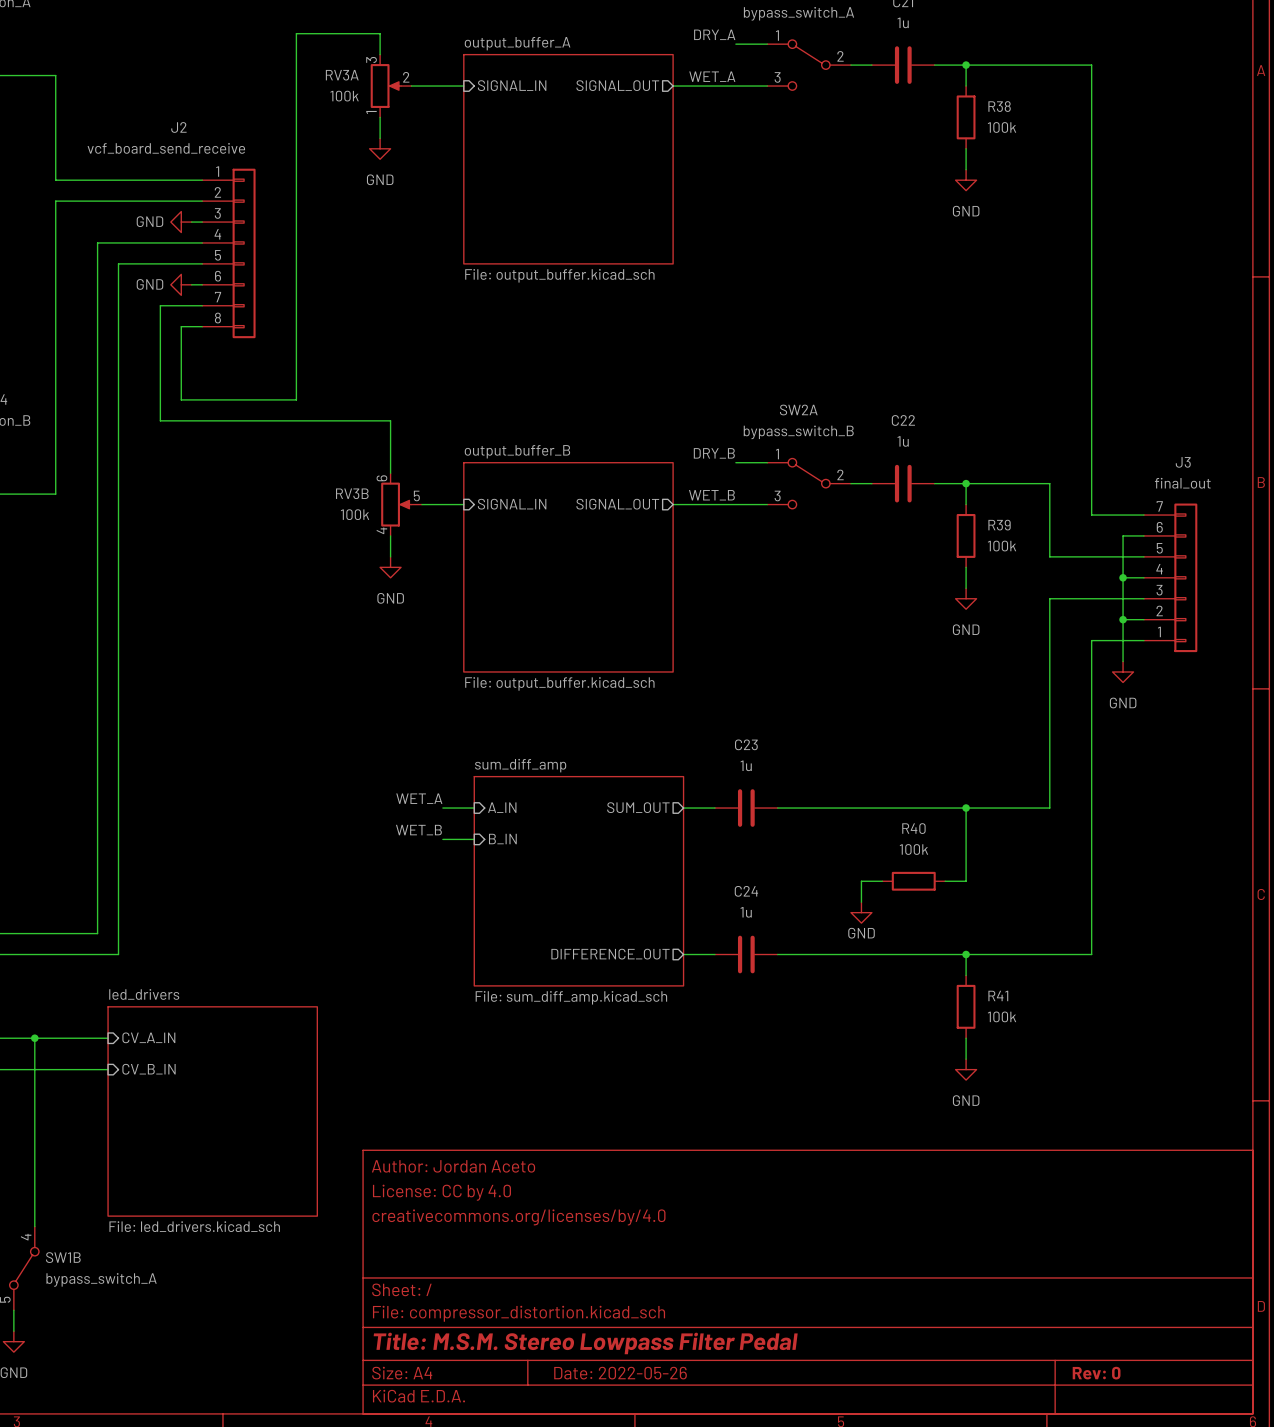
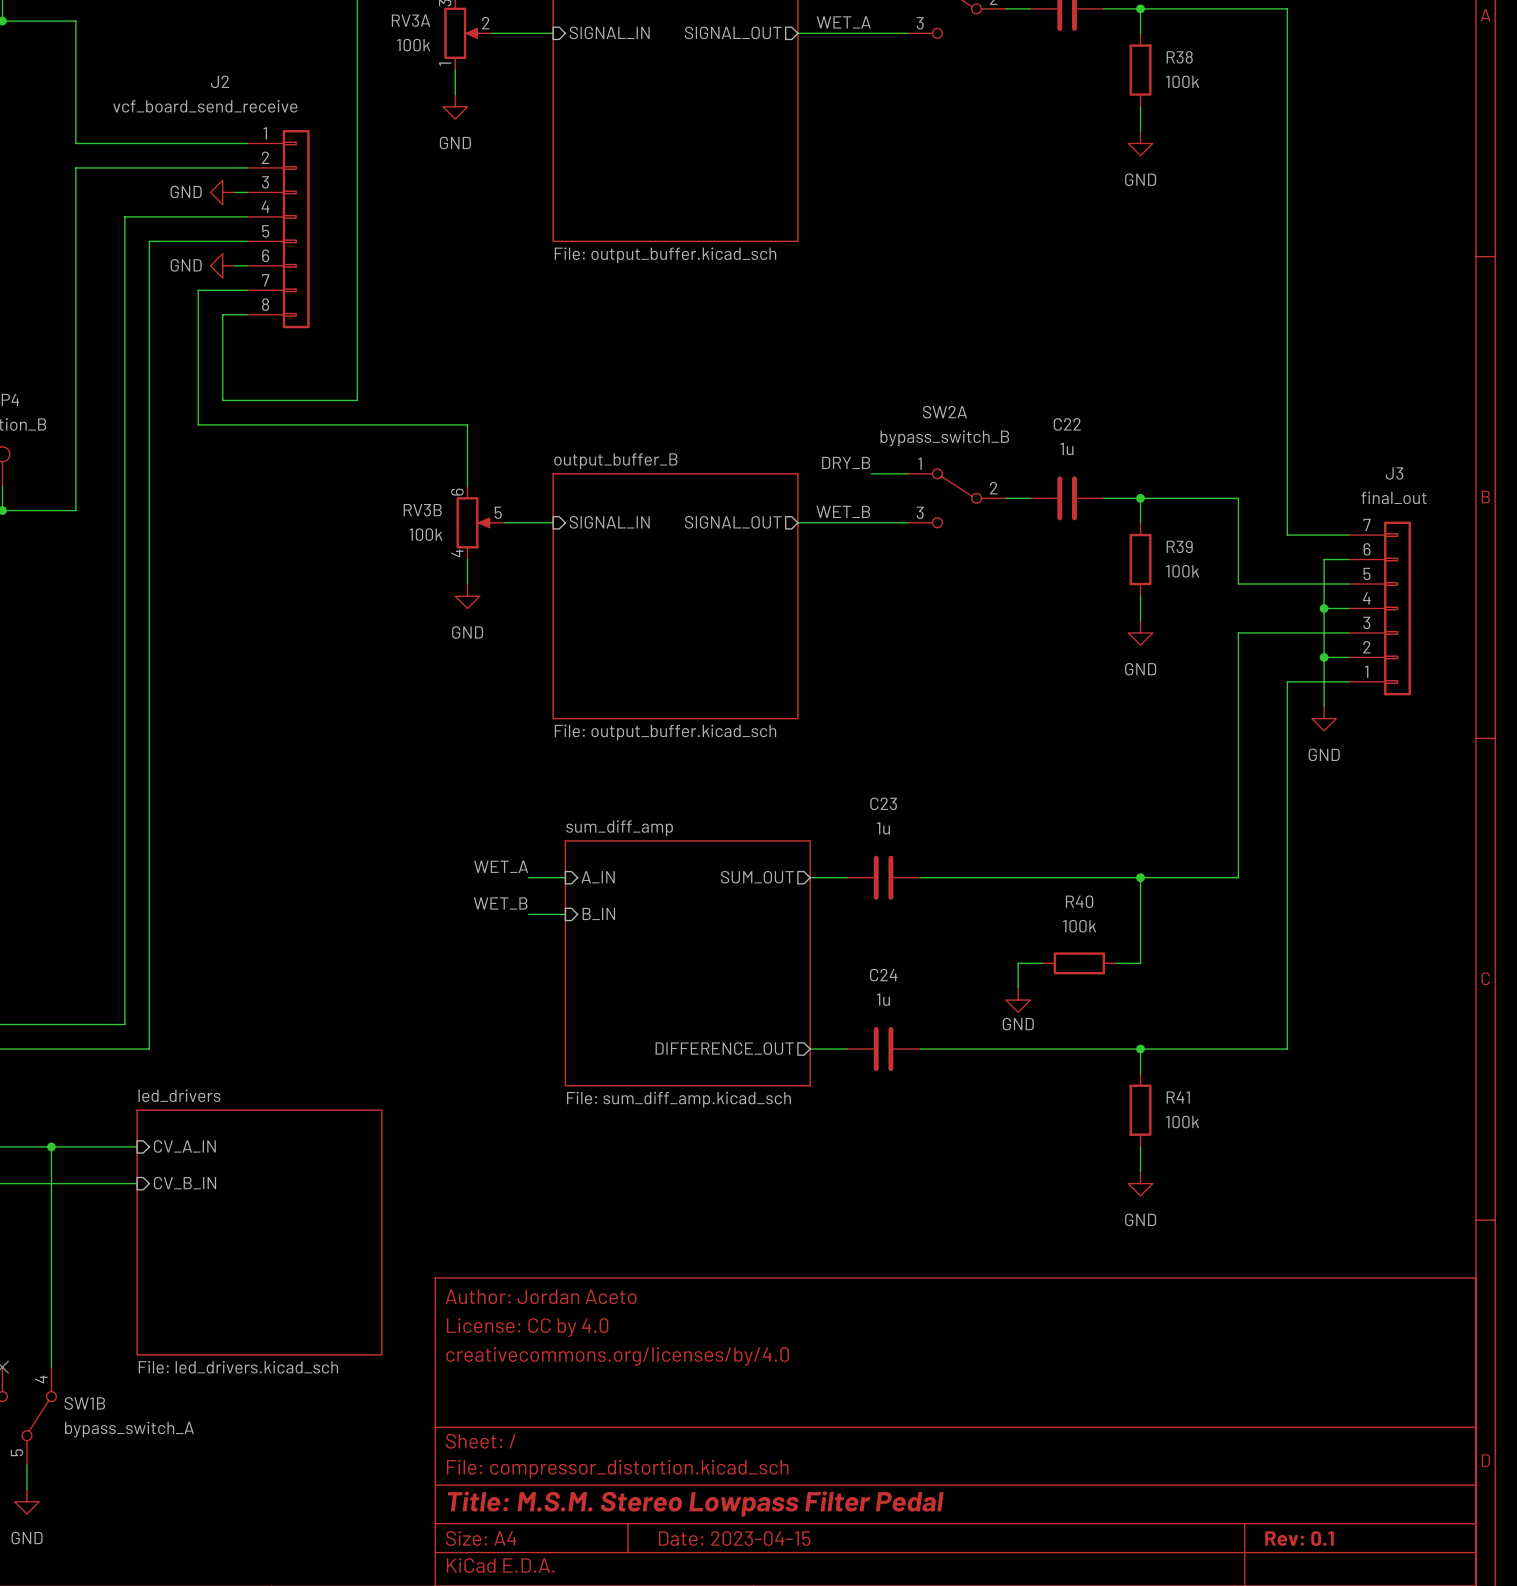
title block: Date: 2022-05-26 (620, 1373) -> Date: 2023-04-15 (734, 1538)
title block: Rev: 0 (1096, 1373) -> Rev: 0.1 (1299, 1538)

